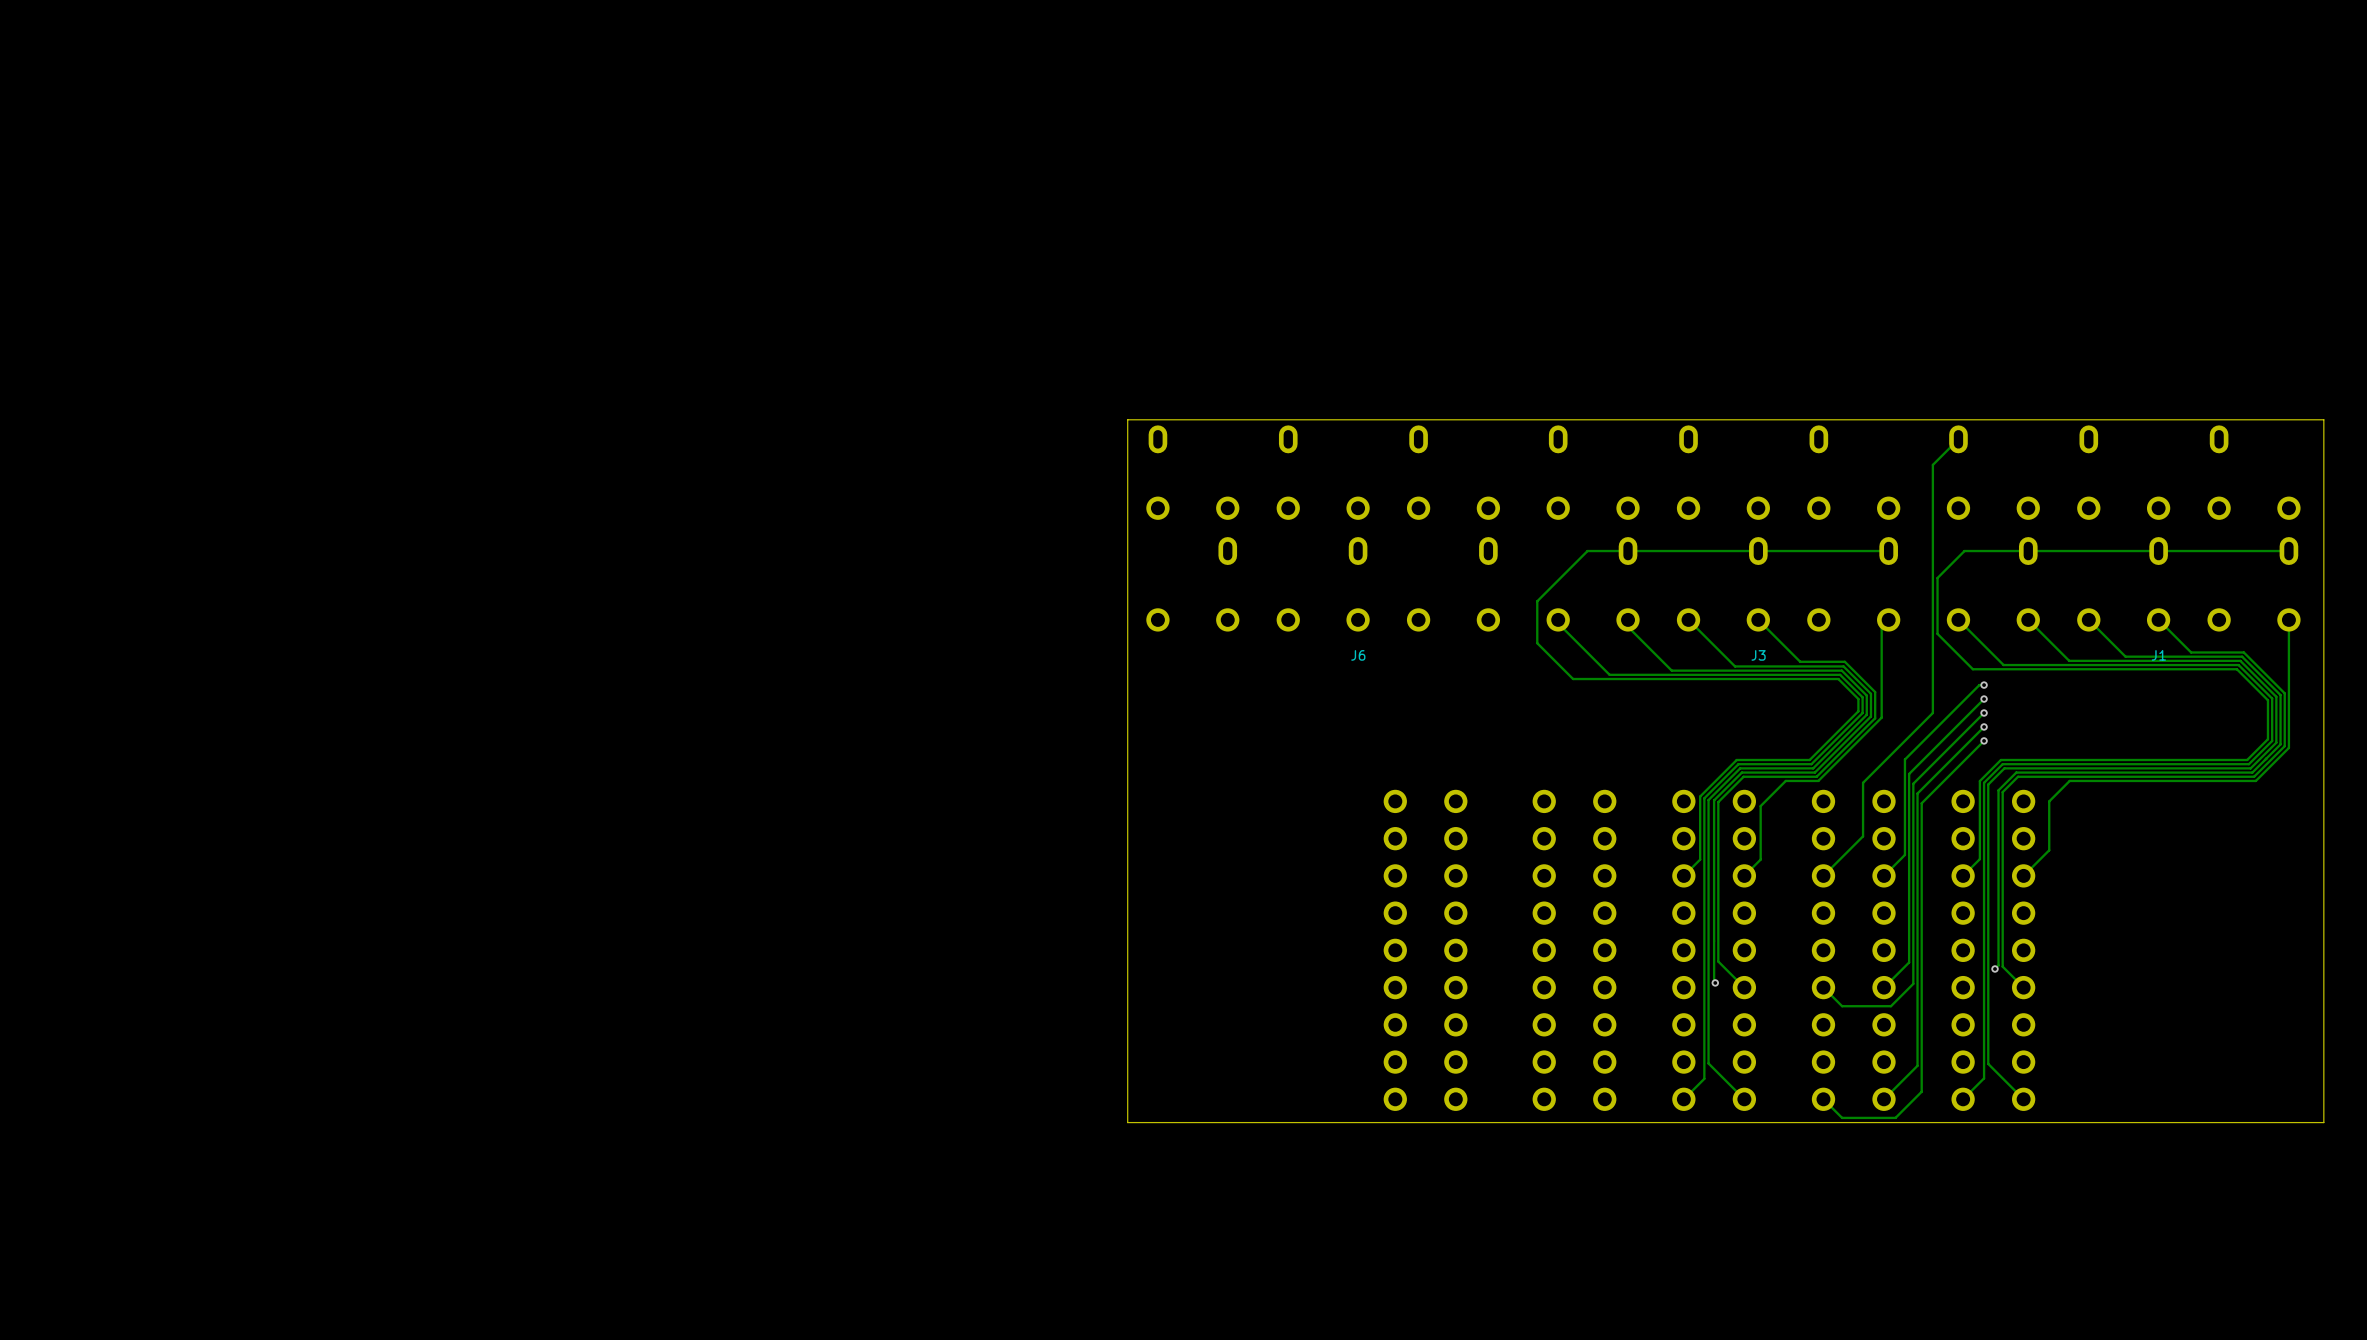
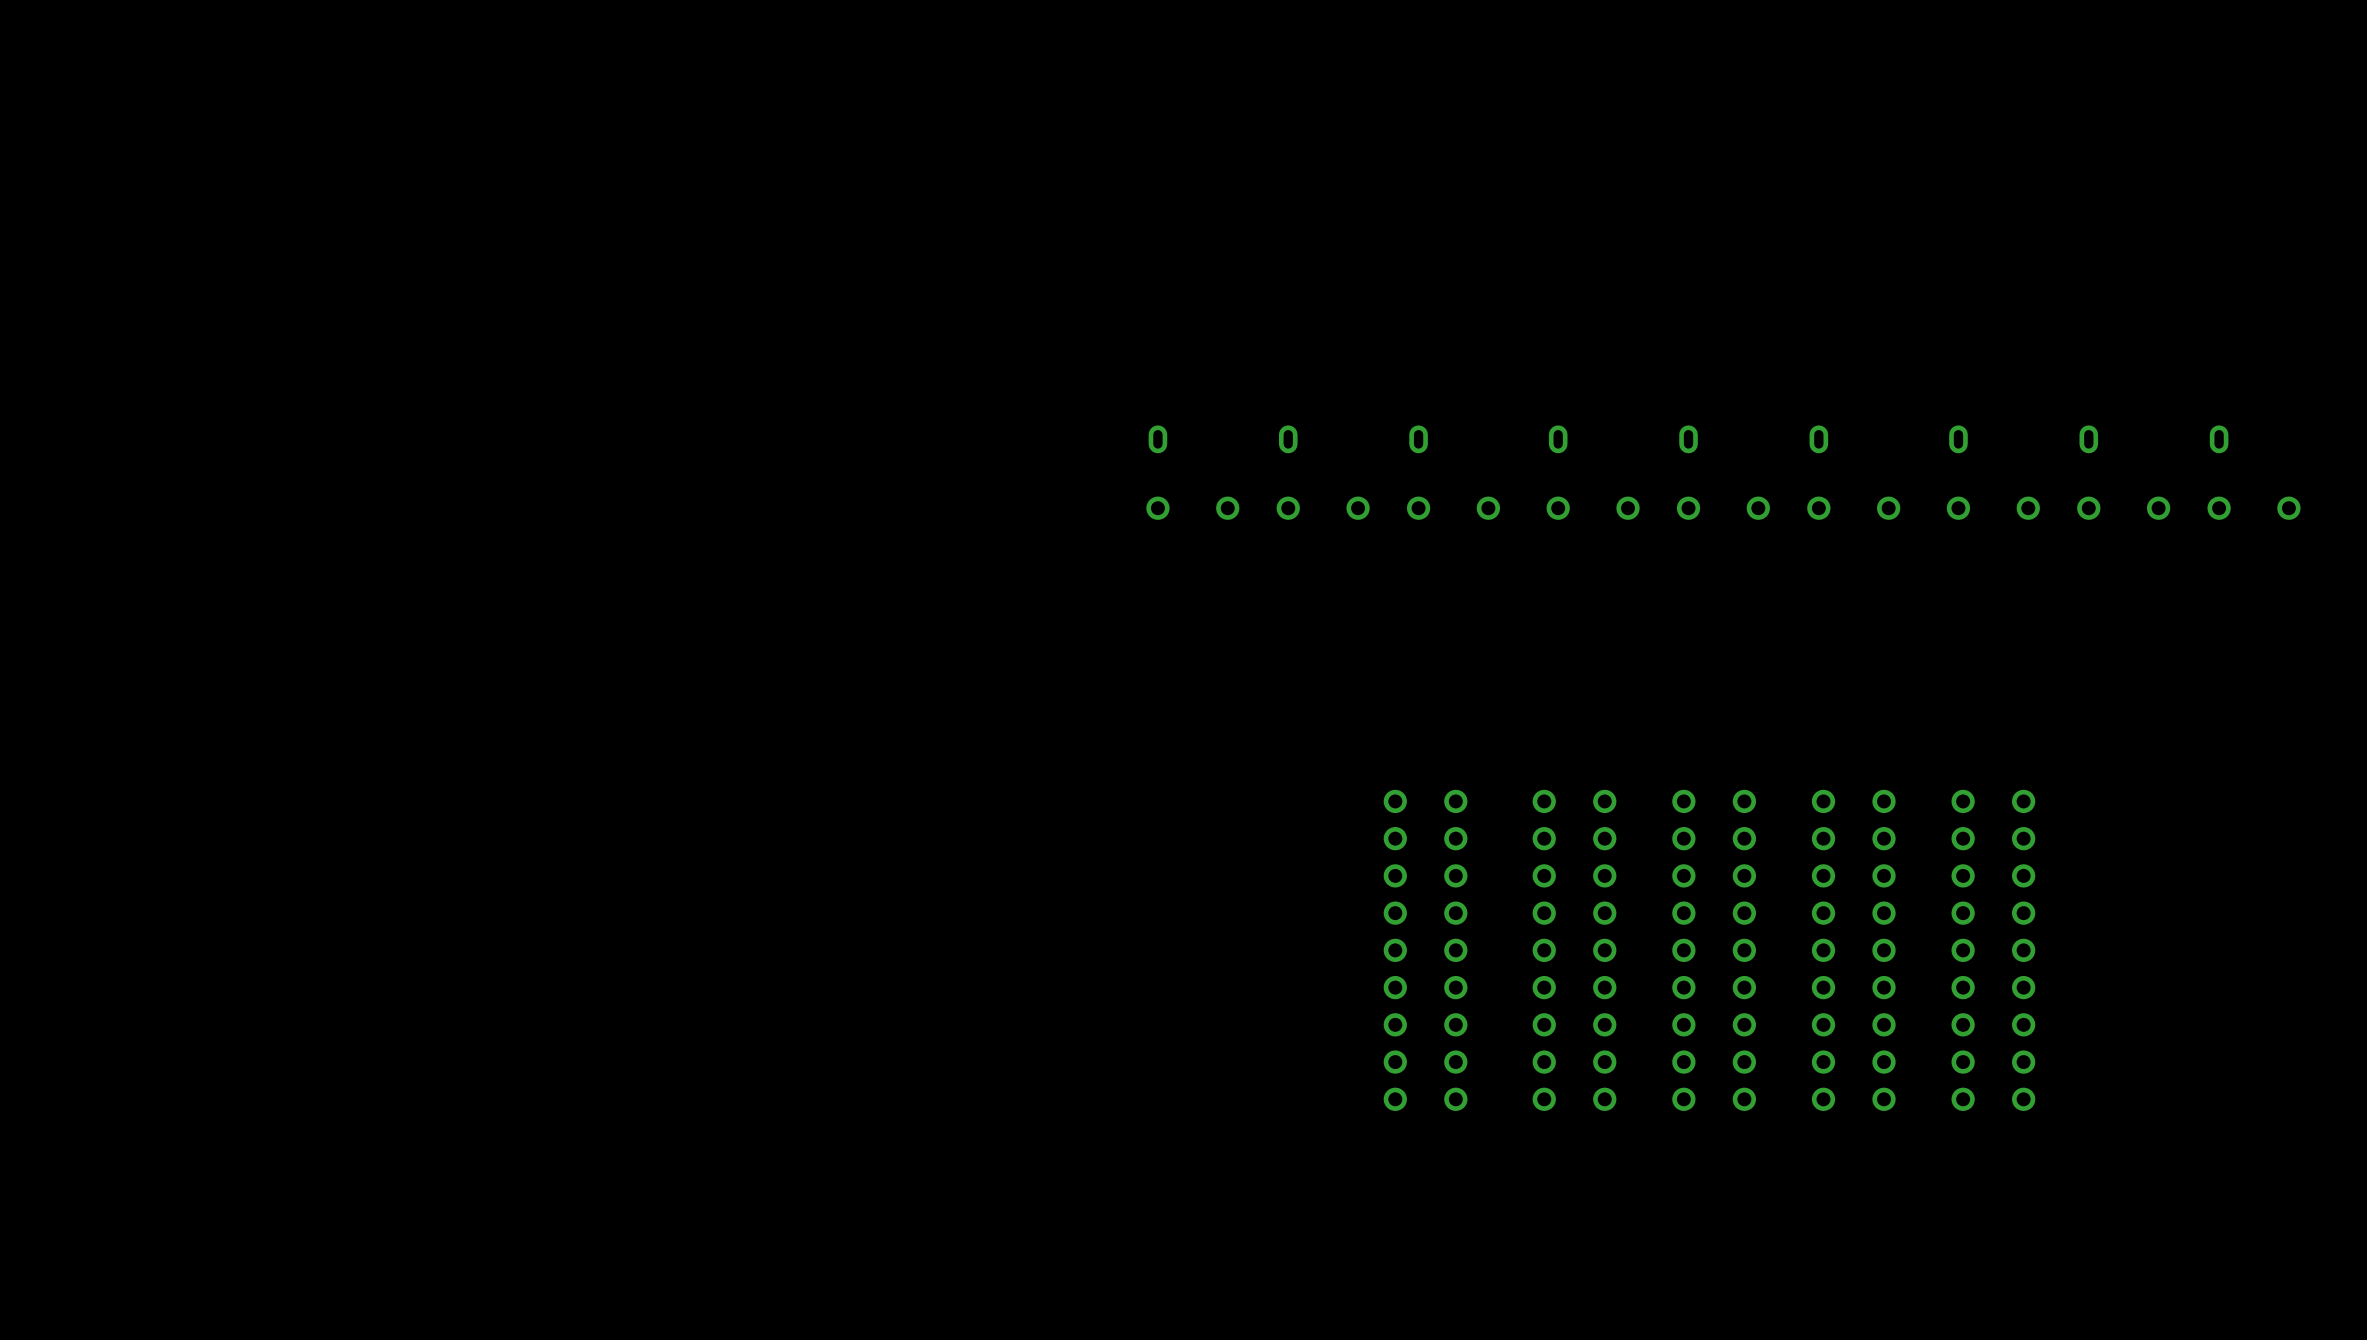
board edge: (2323, 419) (1127, 419) (1127, 1122) (2323, 1122) (2323, 419) -> none
track: (1958, 439) (1932, 464) (1932, 713) (1863, 782) (1863, 836) (1823, 875) -> none
track: (1888, 551) (1587, 551) (1537, 601) (1537, 643) (1573, 679) (1838, 679) (1858, 699) (1858, 711) (1809, 760) (1736, 760) (1700, 796) (1700, 859) (1683, 875) -> none
track: (2288, 551) (1964, 551) (1937, 578) (1937, 633) (1972, 669) (2236, 669) (2267, 700) (2267, 739) (2247, 760) (2000, 760) (1979, 781) (1979, 859) (1963, 875) -> none
J6: (1323, 584) -> none
J3: (1723, 584) -> none
J1: (2123, 584) -> none
track: (1558, 619) (1558, 623) (1609, 674) (1840, 674) (1862, 697) (1862, 713) (1811, 764) (1738, 764) (1704, 798) (1704, 1078) (1683, 1099) -> none
track: (1628, 619) (1628, 626) (1671, 670) (1841, 670) (1866, 695) (1866, 714) (1813, 768) (1740, 768) (1708, 800) (1708, 1063) (1744, 1099) -> none
track: (1688, 619) (1735, 666) (1843, 666) (1870, 693) (1870, 716) (1814, 772) (1741, 772) (1714, 800) (1715, 982) -> none
track: (1758, 619) (1800, 661) (1844, 661) (1875, 692) (1875, 718) (1816, 776) (1743, 776) (1718, 802) (1718, 961) (1744, 987) -> none
track: (1888, 619) (1881, 626) (1881, 717) (1818, 780) (1785, 780) (1760, 806) (1760, 859) (1744, 875) -> none
track: (1958, 619) (2003, 665) (2238, 665) (2272, 698) (2272, 740) (2248, 764) (2002, 764) (1984, 782) (1984, 1078) (1963, 1099) -> none
track: (2028, 619) (2069, 660) (2240, 660) (2276, 696) (2276, 742) (2250, 768) (2004, 768) (1988, 784) (1988, 1063) (2023, 1099) -> none
track: (2088, 619) (2125, 656) (2242, 656) (2280, 695) (2280, 744) (2252, 772) (2016, 772) (1998, 790) (1998, 965) (1995, 968) -> none
track: (2158, 619) (2191, 652) (2243, 652) (2284, 693) (2284, 746) (2254, 776) (2018, 776) (2002, 792) (2002, 966) (2023, 987) -> none
track: (2288, 619) (2288, 747) (2255, 780) (2069, 780) (2049, 801) (2049, 850) (2023, 875) -> none
track: (1984, 685) (1979, 685) (1904, 759) (1904, 854) (1884, 875) -> none
via: (1984, 685) -> none
track: (1984, 699) (1909, 773) (1909, 962) (1884, 987) -> none
via: (1984, 699) -> none
track: (1984, 713) (1913, 783) (1913, 983) (1890, 1006) (1842, 1006) (1823, 987) -> none
via: (1984, 713) -> none
track: (1984, 726) (1917, 793) (1917, 1065) (1884, 1099) -> none
via: (1984, 726) -> none
track: (1984, 740) (1921, 803) (1921, 1091) (1895, 1117) (1842, 1117) (1823, 1099) -> none
via: (1984, 740) -> none
via: (1995, 968) -> none
via: (1715, 982) -> none

